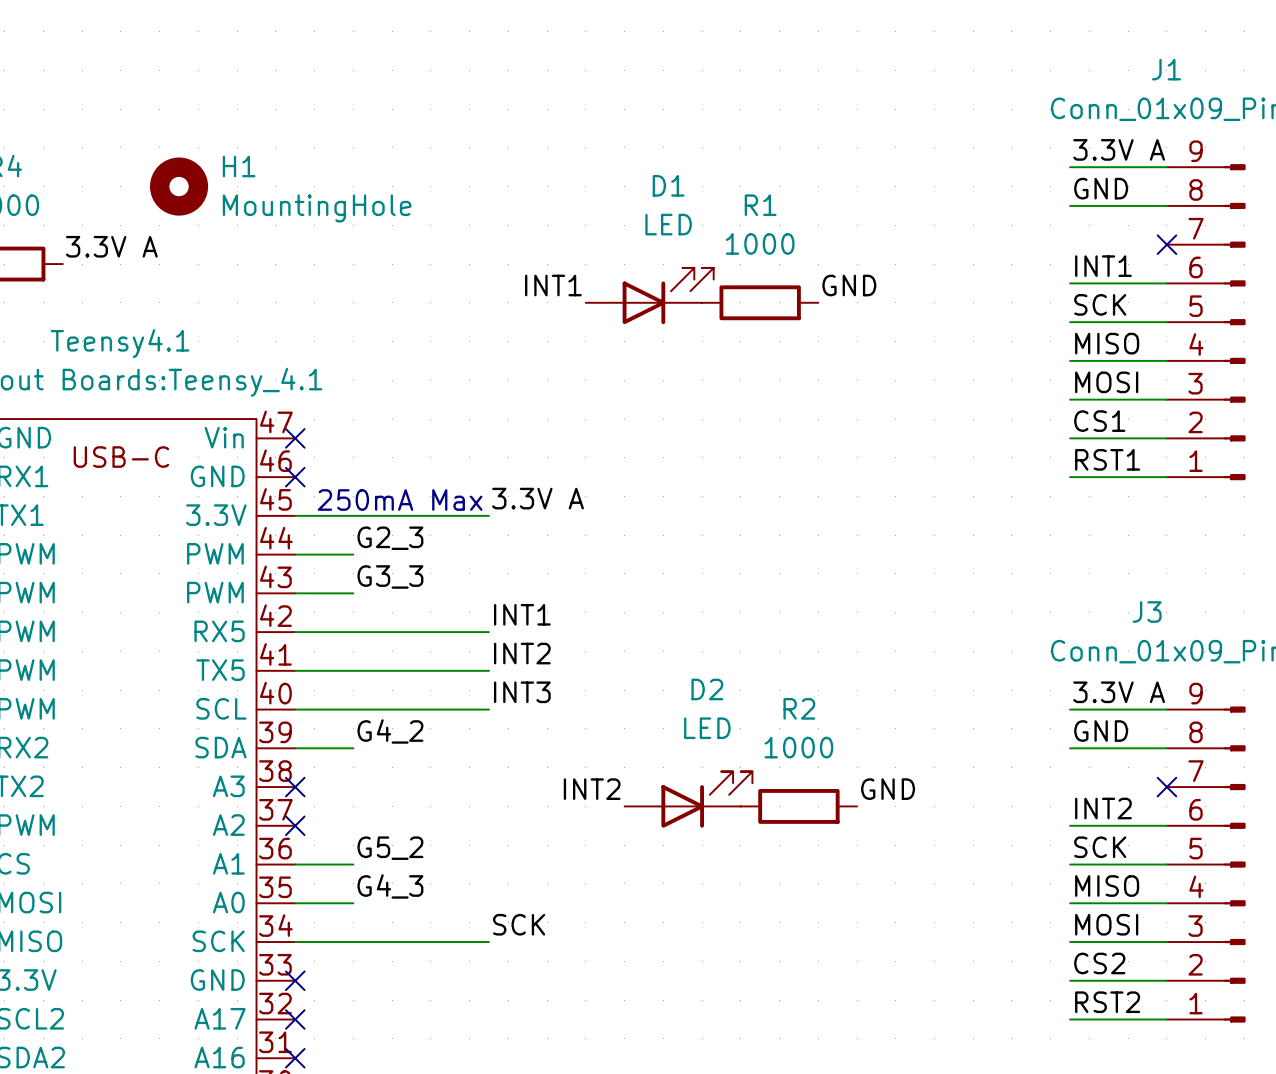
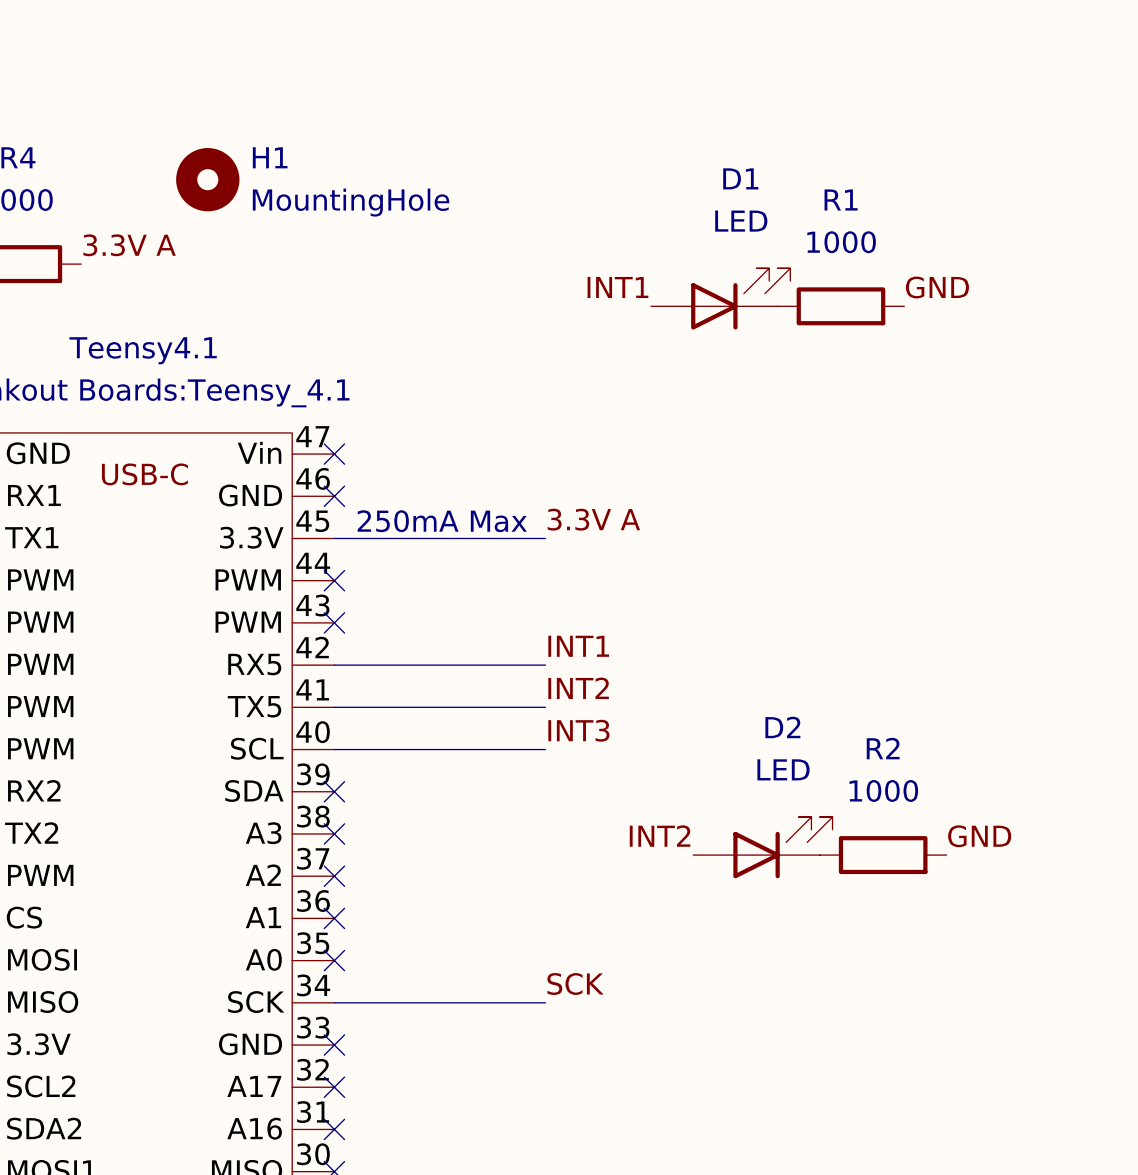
label: G2_3 (390, 538) -> none
wire: (295, 554) (353, 554) -> none
no-connect mark: none -> (334, 580)
label: G3_3 (390, 576) -> none
wire: (295, 593) (353, 593) -> none
no-connect mark: none -> (334, 622)
label: G4_2 (390, 731) -> none
wire: (295, 748) (353, 748) -> none
no-connect mark: none -> (334, 791)
label: G5_2 (390, 848) -> none
wire: (295, 864) (353, 864) -> none
no-connect mark: none -> (334, 918)
label: G4_3 (390, 886) -> none
wire: (295, 903) (353, 903) -> none
no-connect mark: none -> (334, 960)

